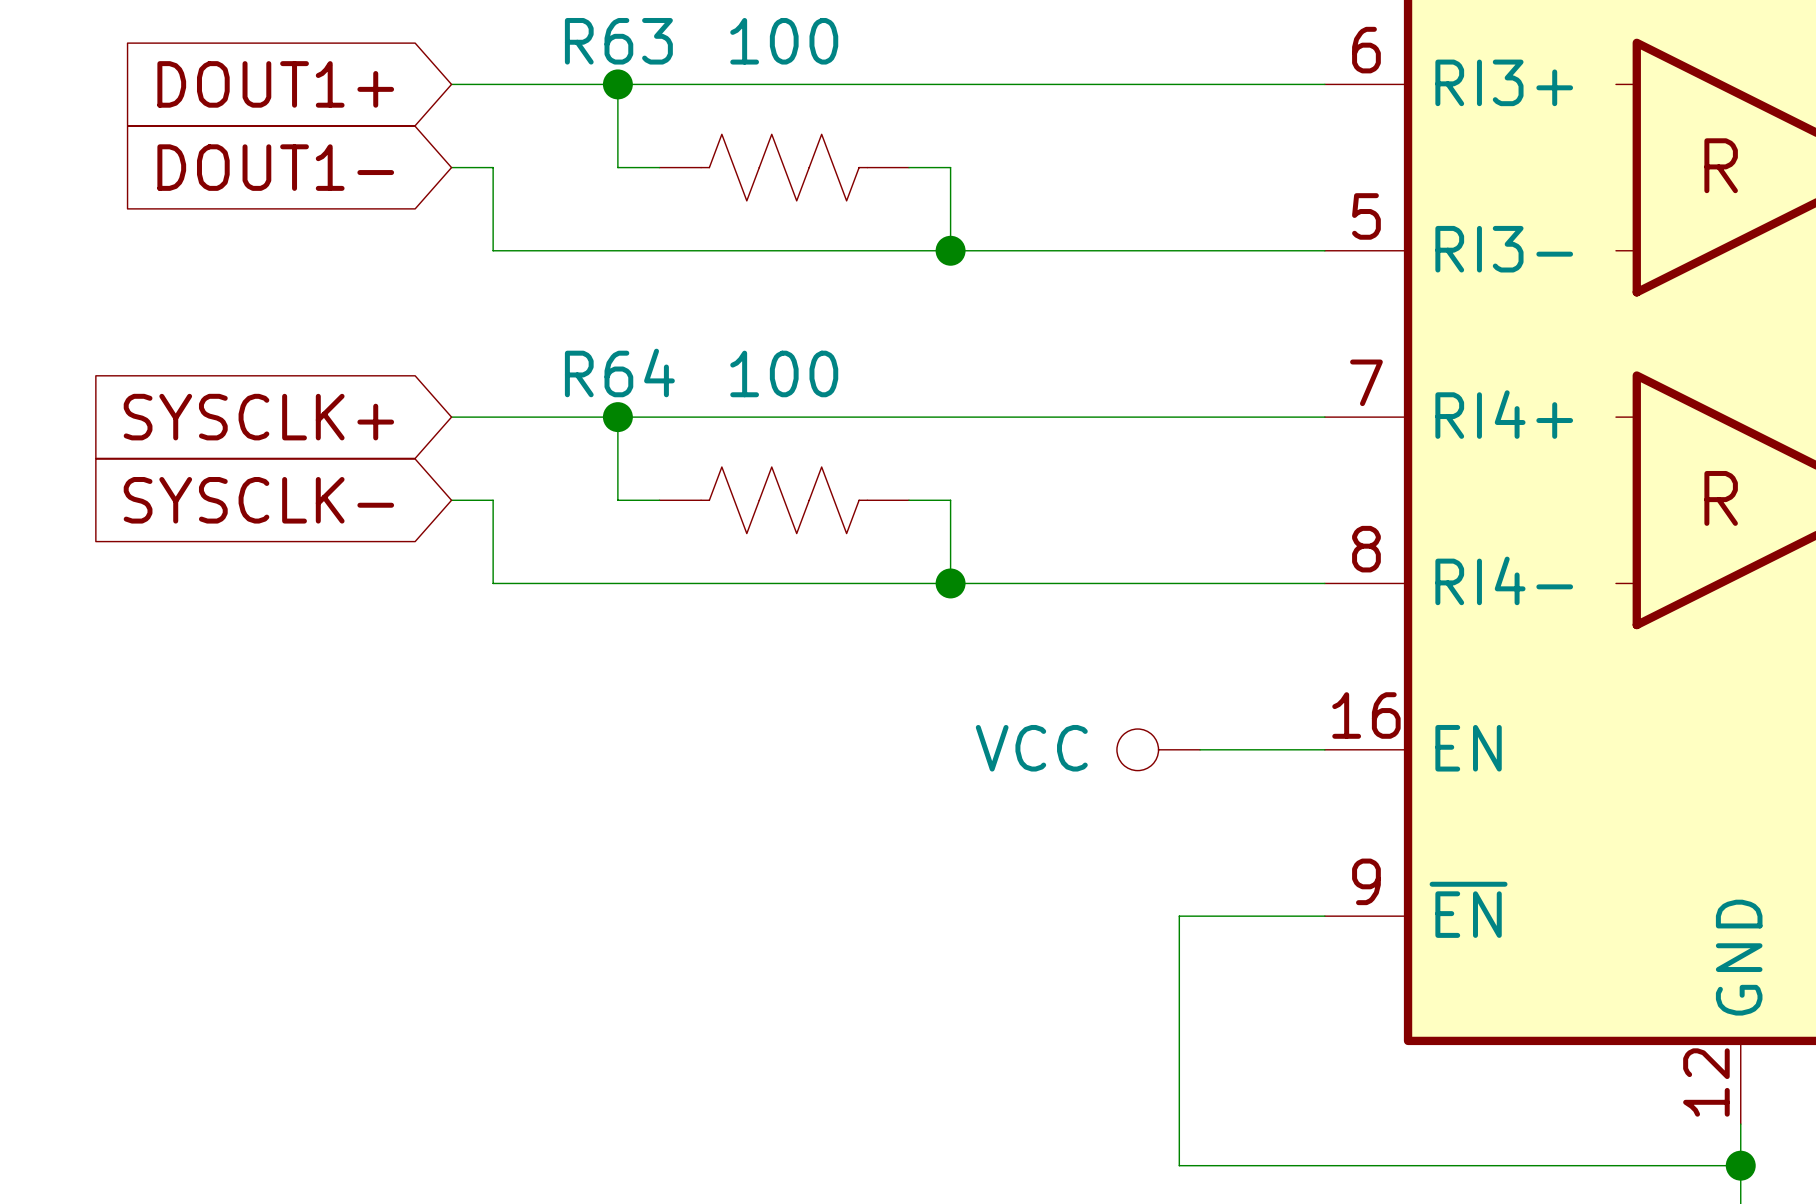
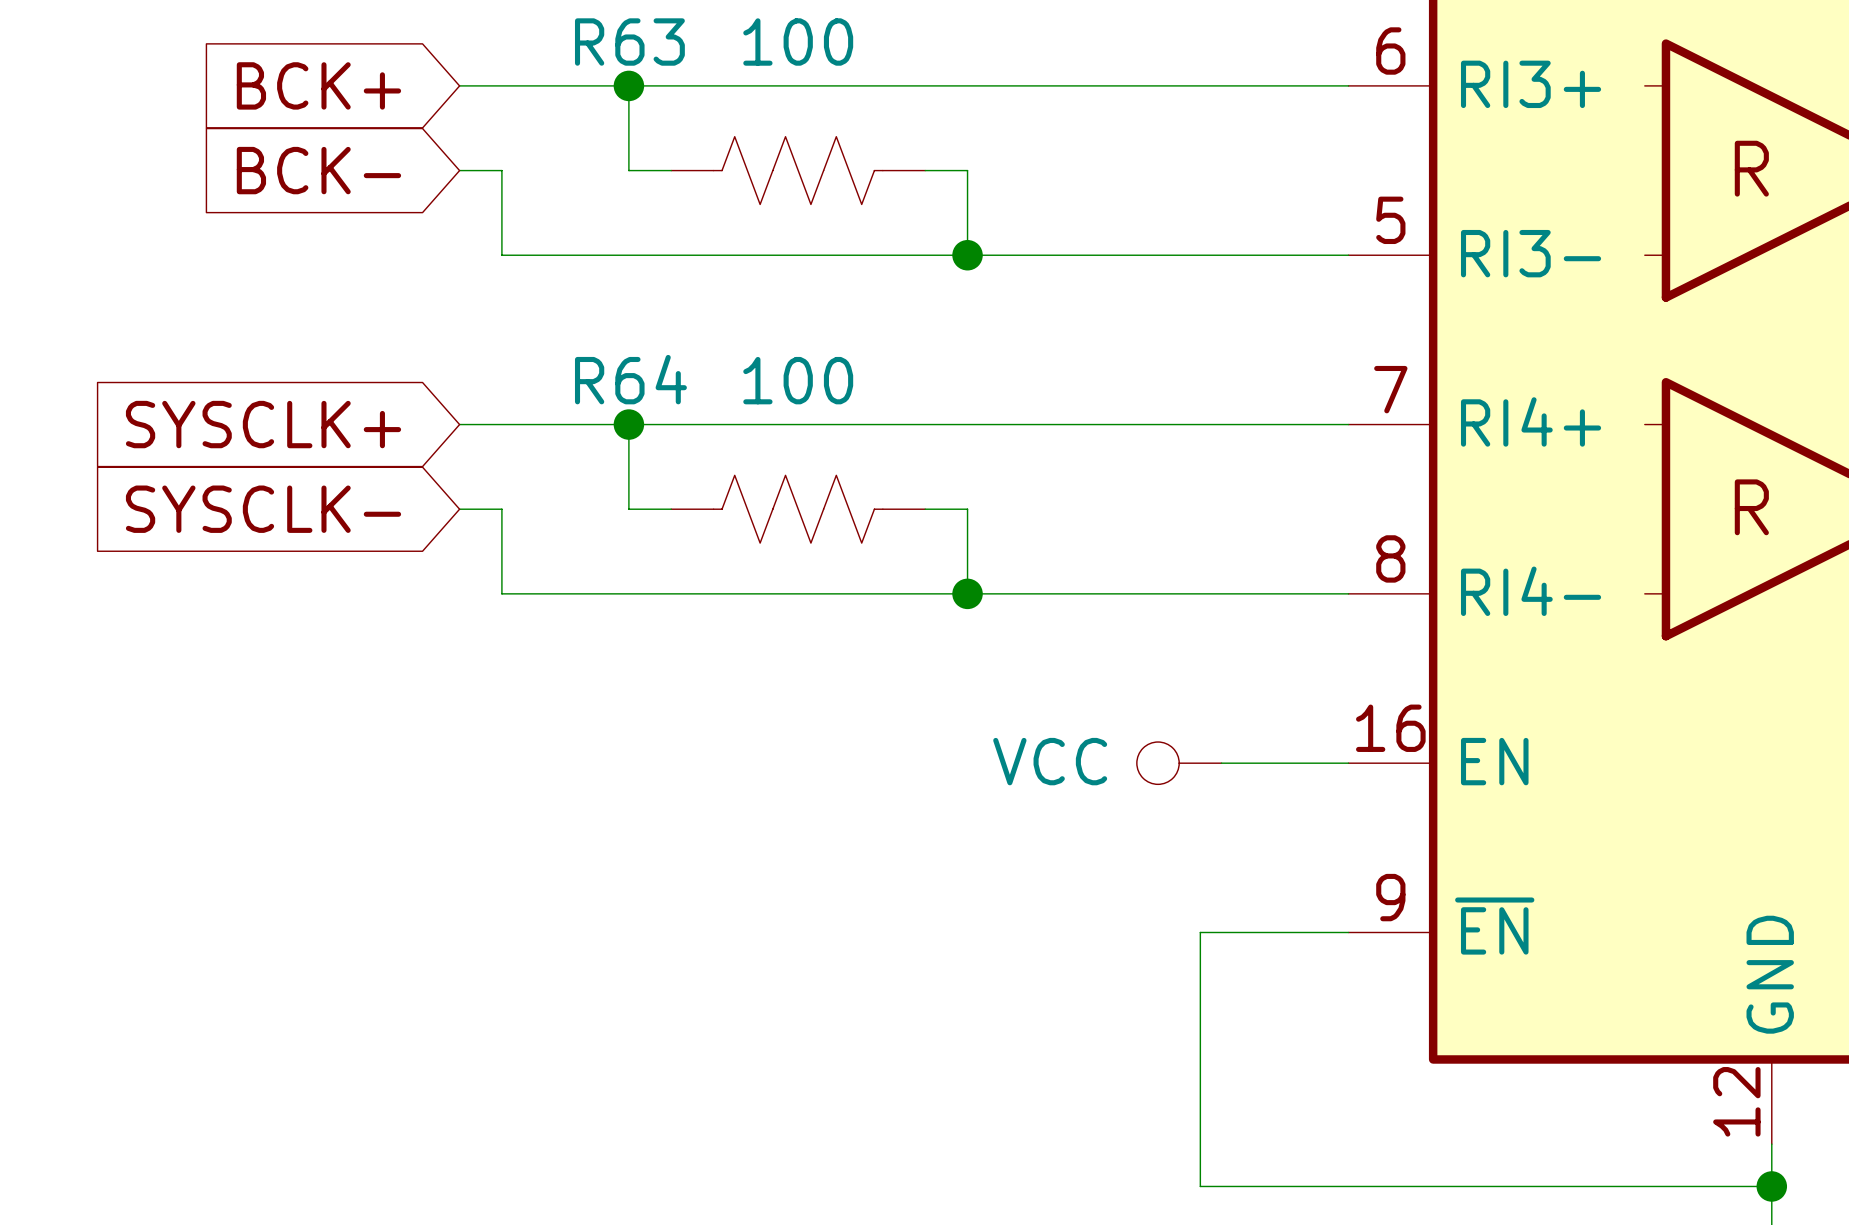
global label: DOUT1+ (275, 84) -> BCK+ (318, 85)
global label: DOUT1- (275, 167) -> BCK- (318, 170)

